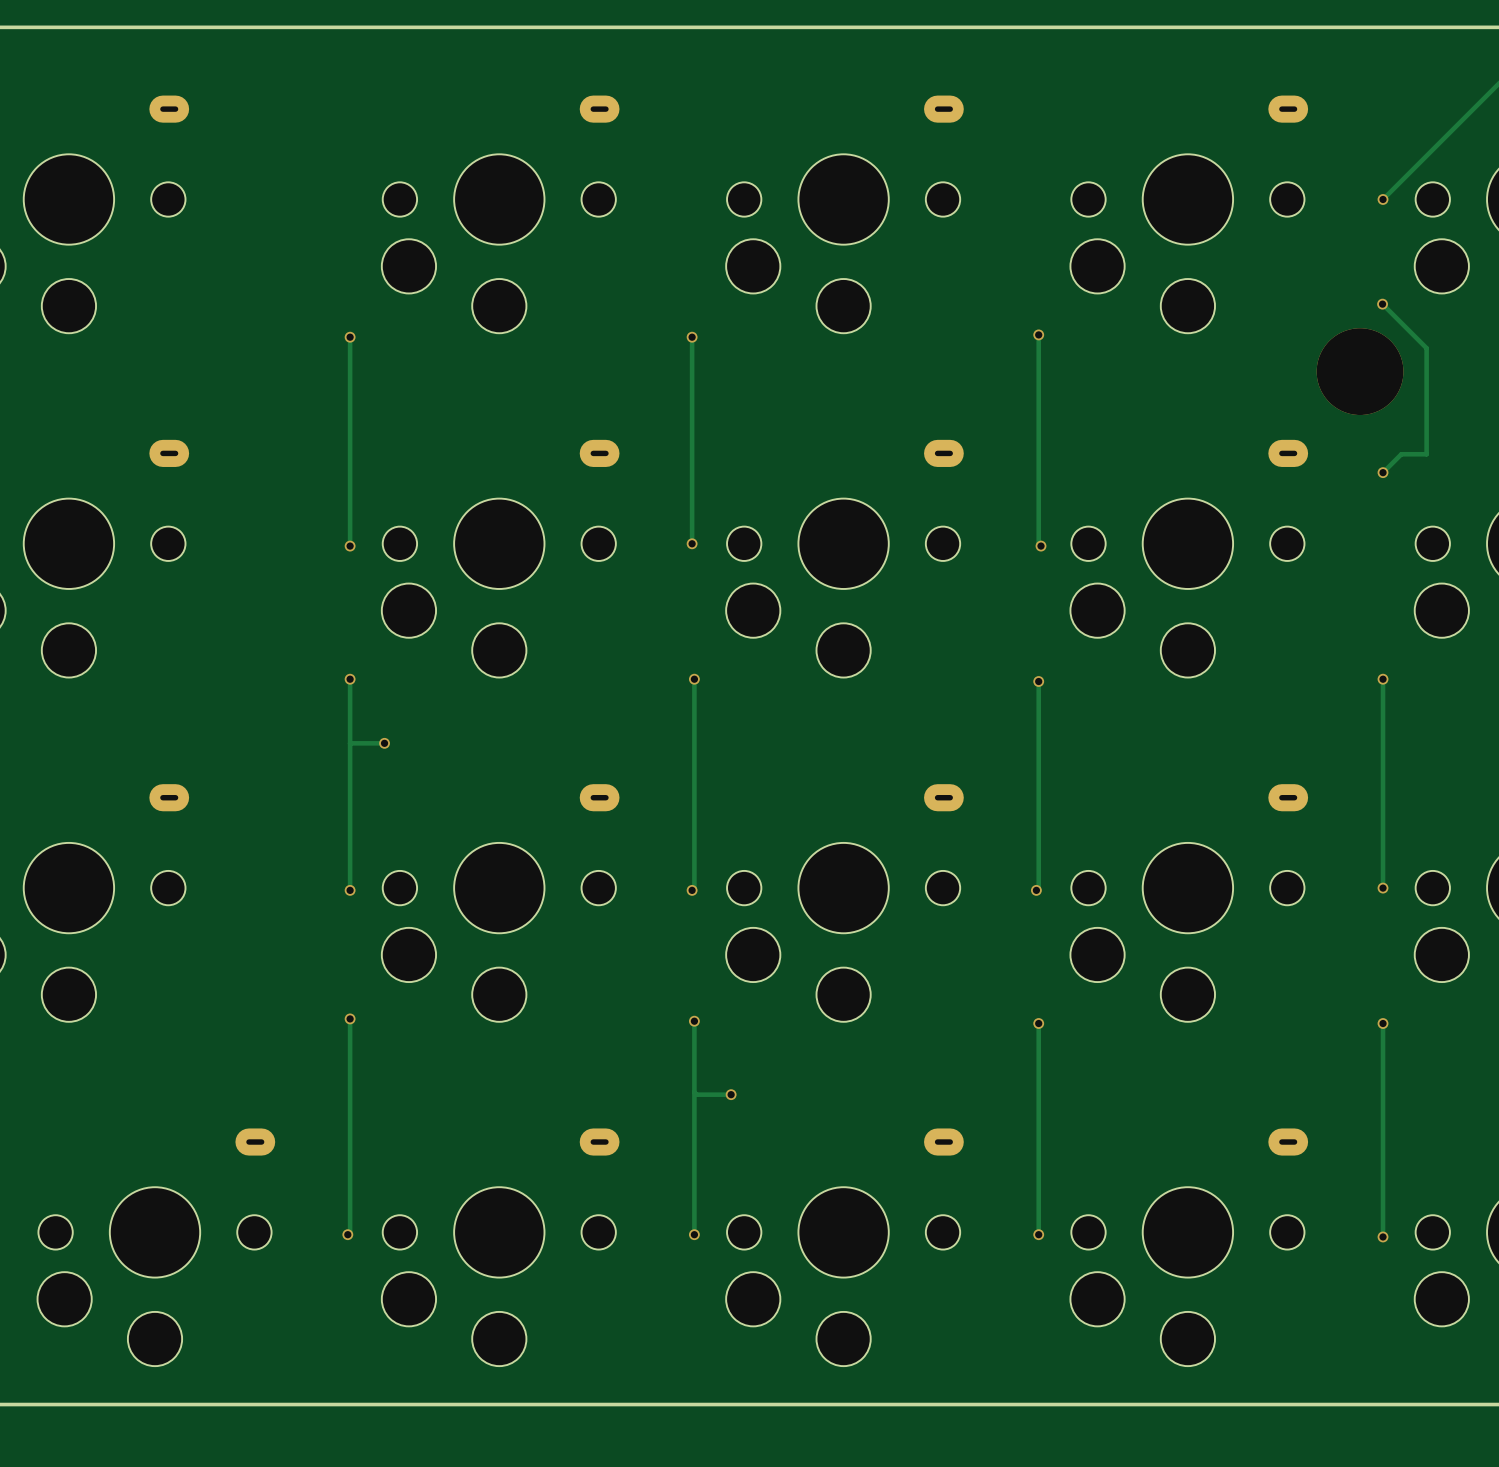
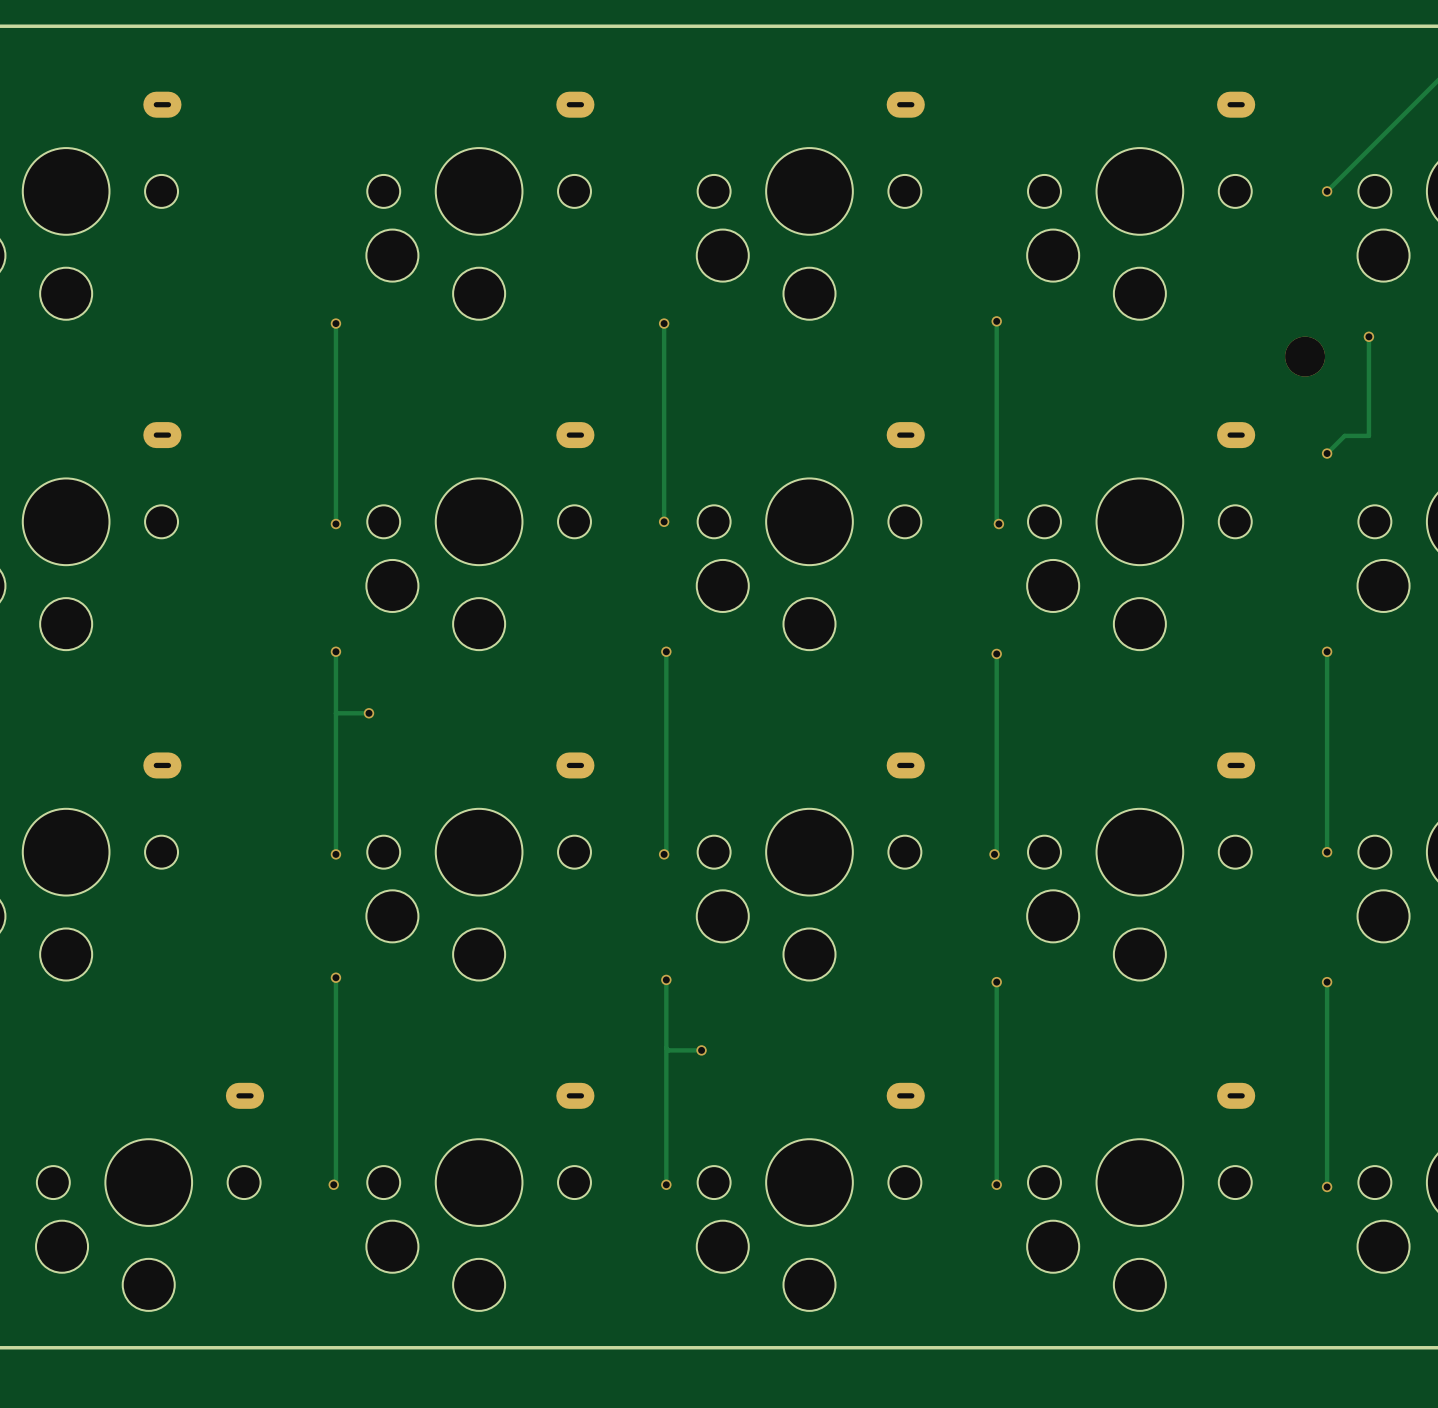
track: (1382, 304) (1426, 348) (1426, 350) -> none
via position: (1382, 304) -> (1368, 336)
part footprint: [1316, 328, 1404, 416] -> [1285, 336, 1326, 377]

